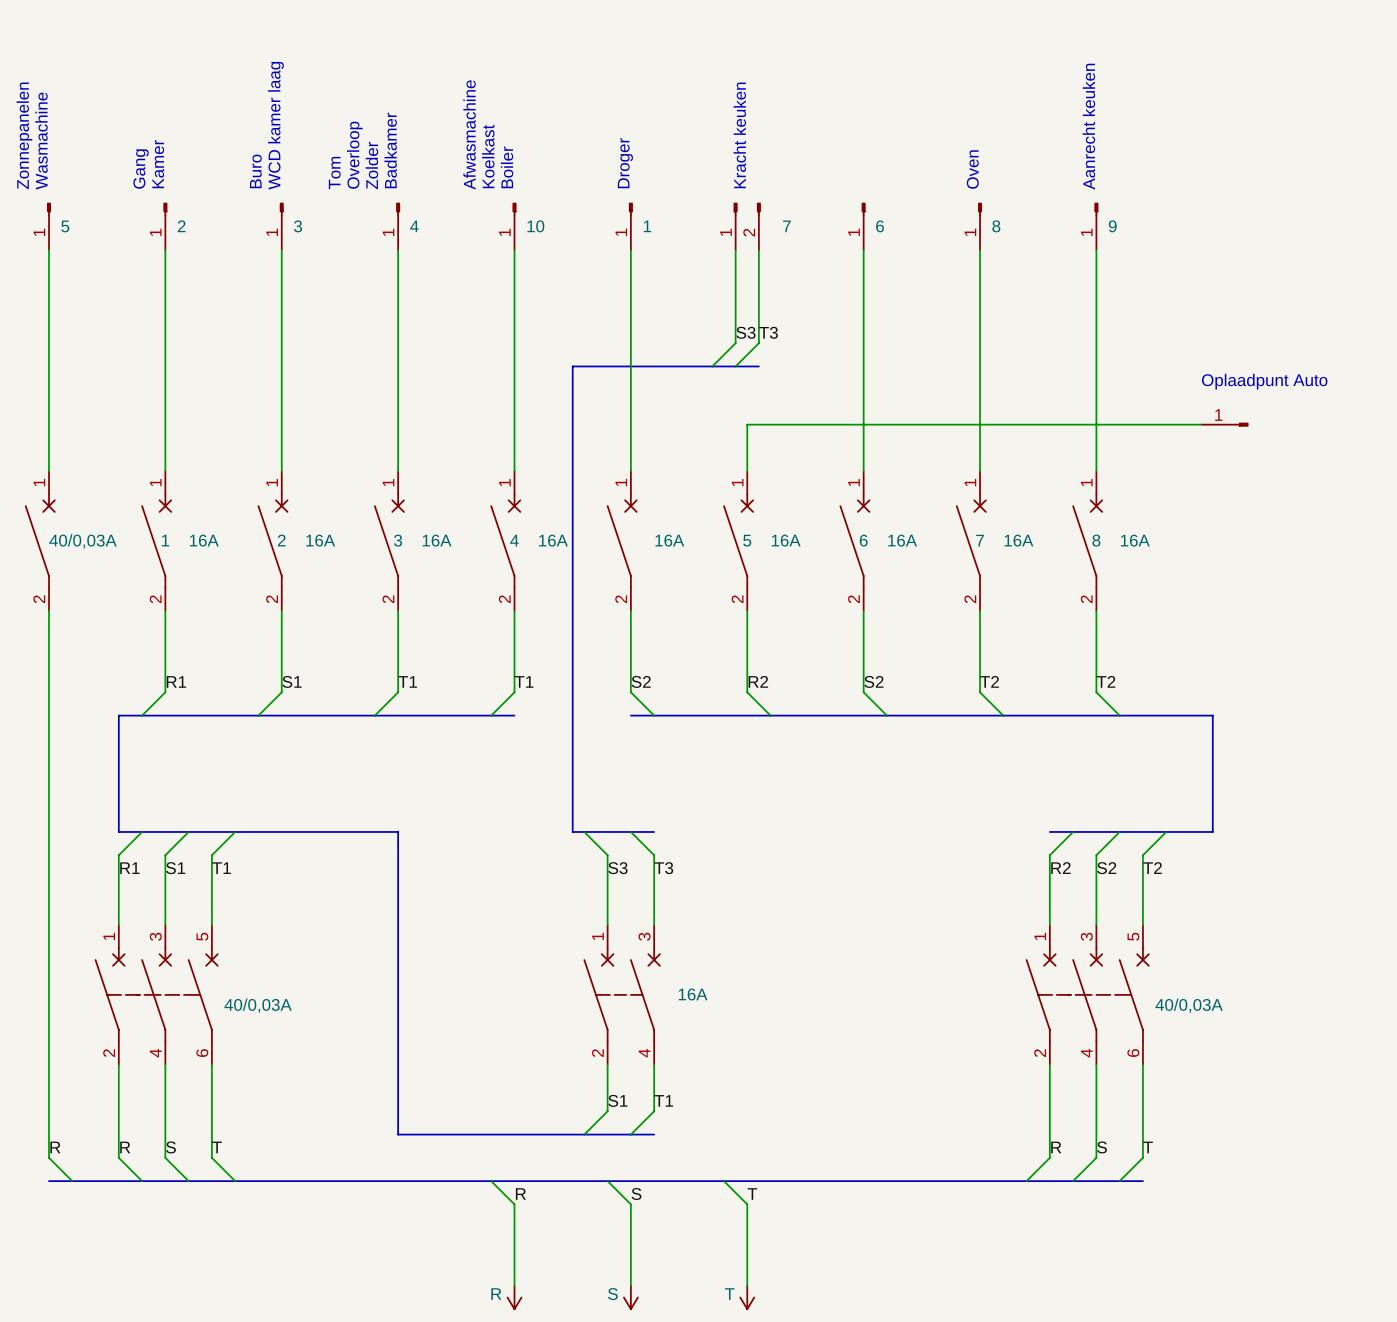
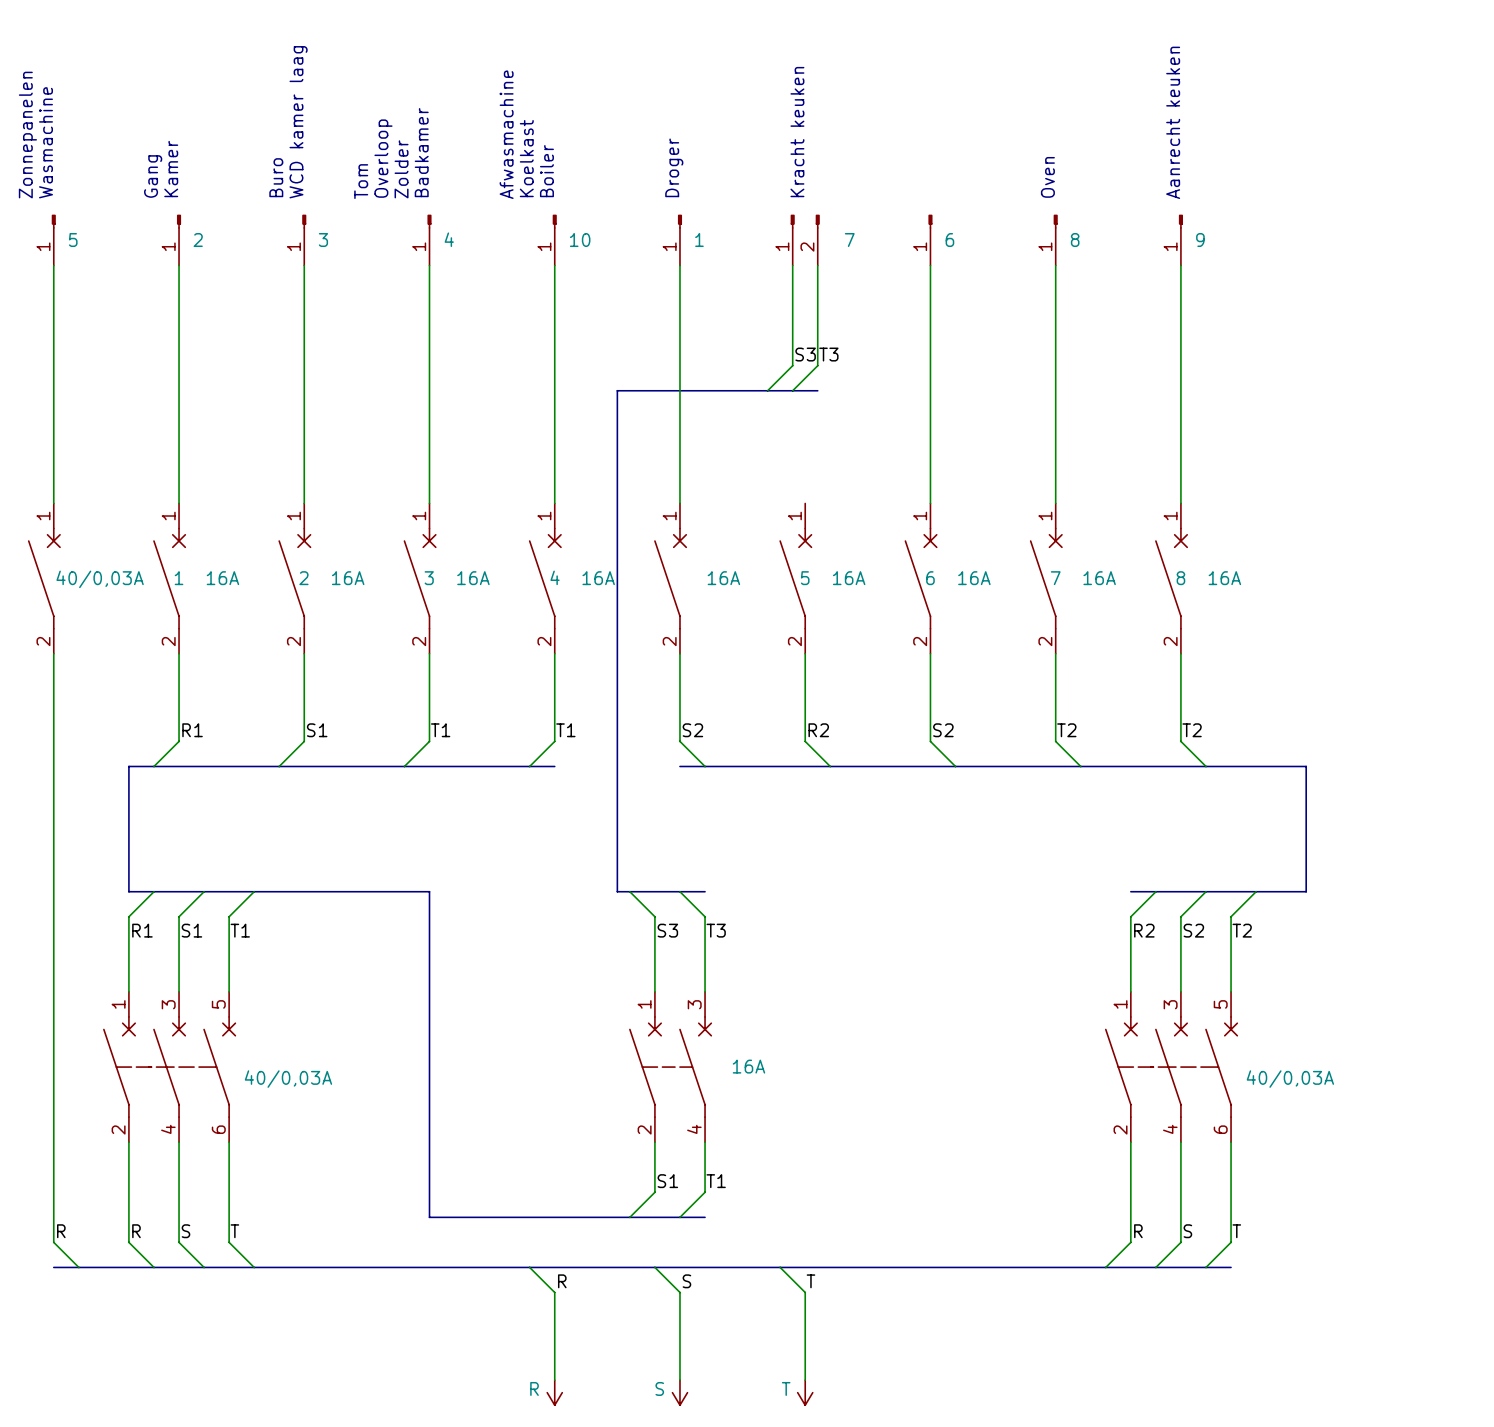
text: Oplaadpunt Auto (1264, 381) -> none
wire: (1201, 424) (747, 424) (747, 471) -> none
part: (1224, 424) -> none

